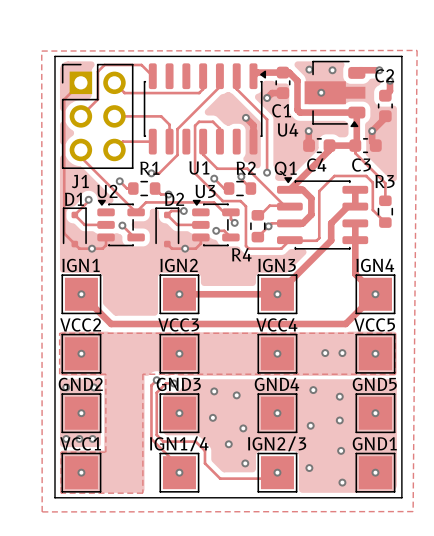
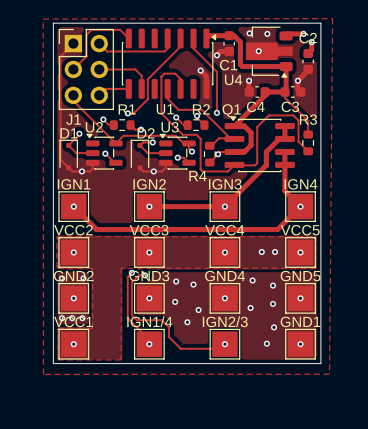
via: (245, 463) -> none
via: (309, 468) -> none
via: none -> (266, 343)
via: (342, 482) -> none

